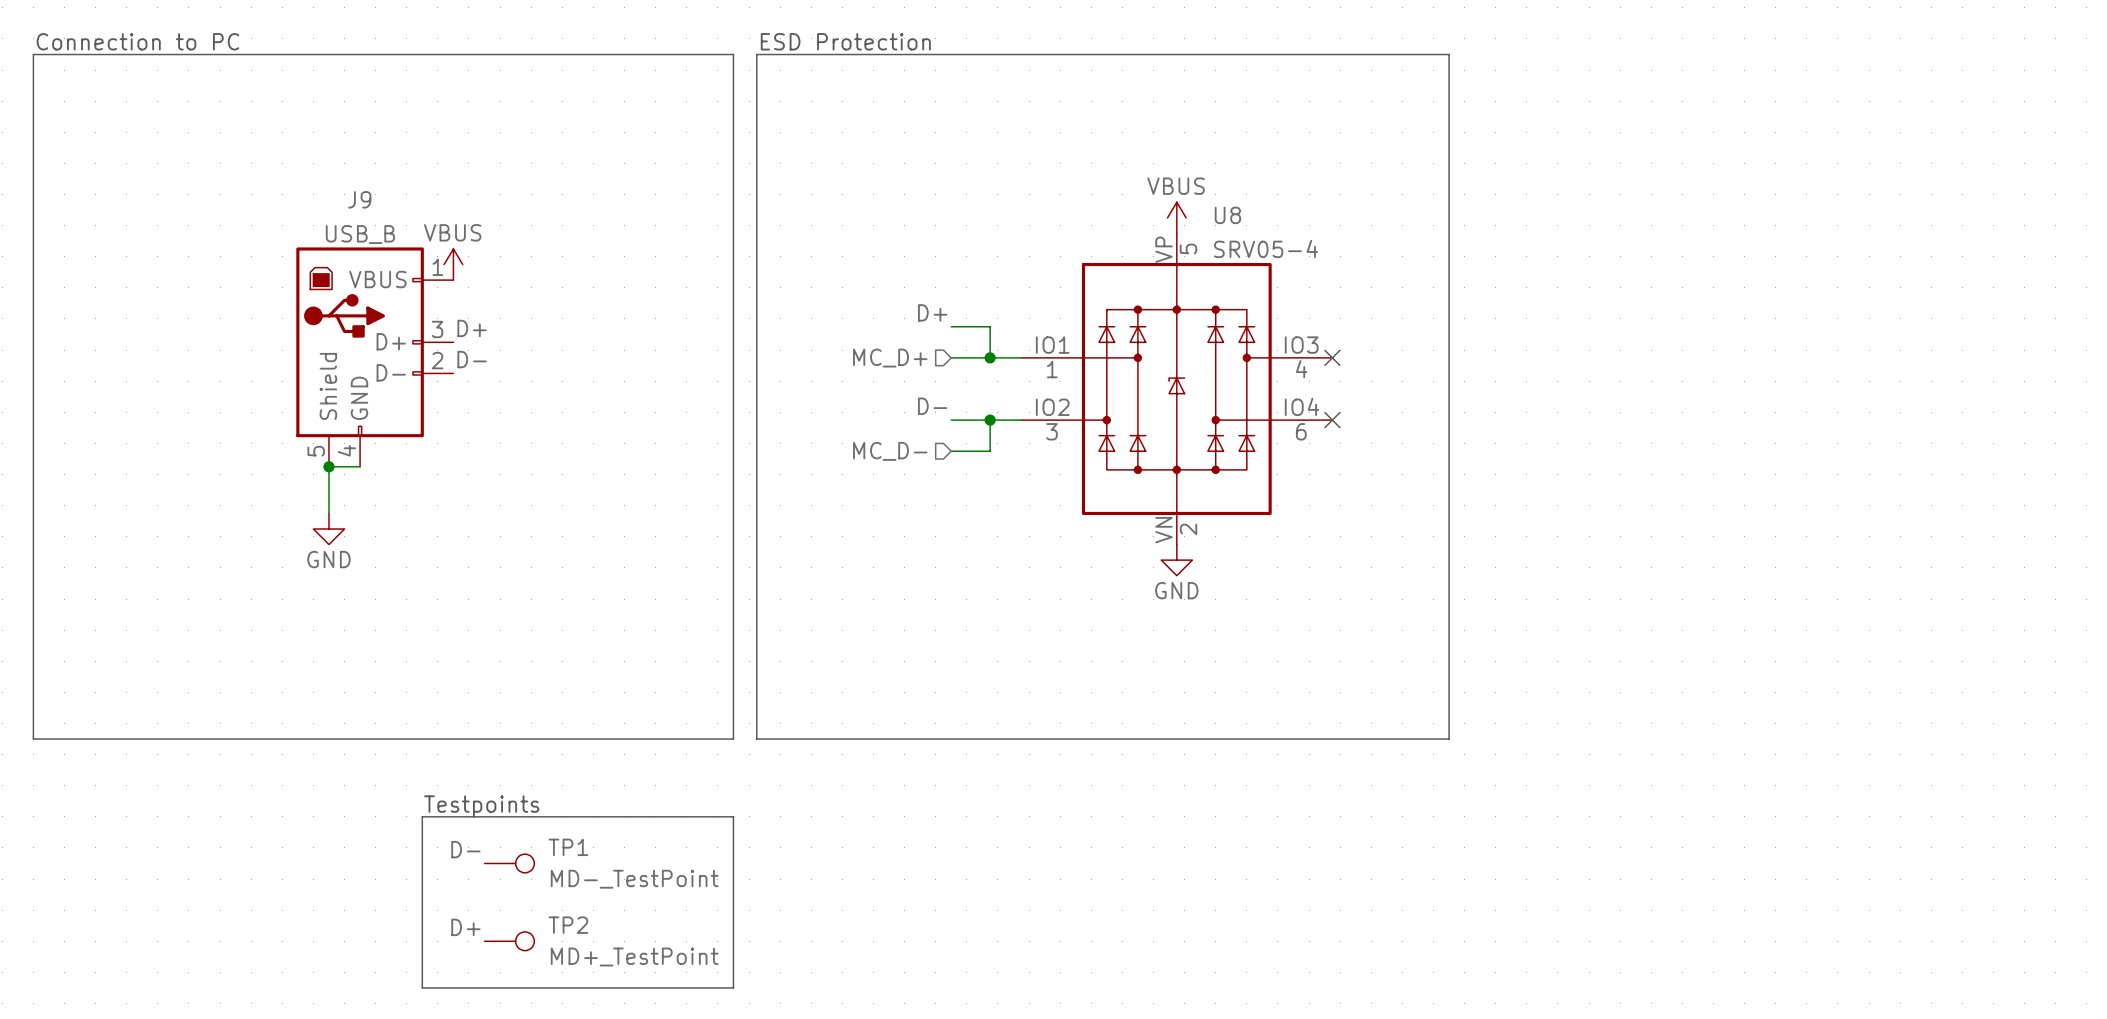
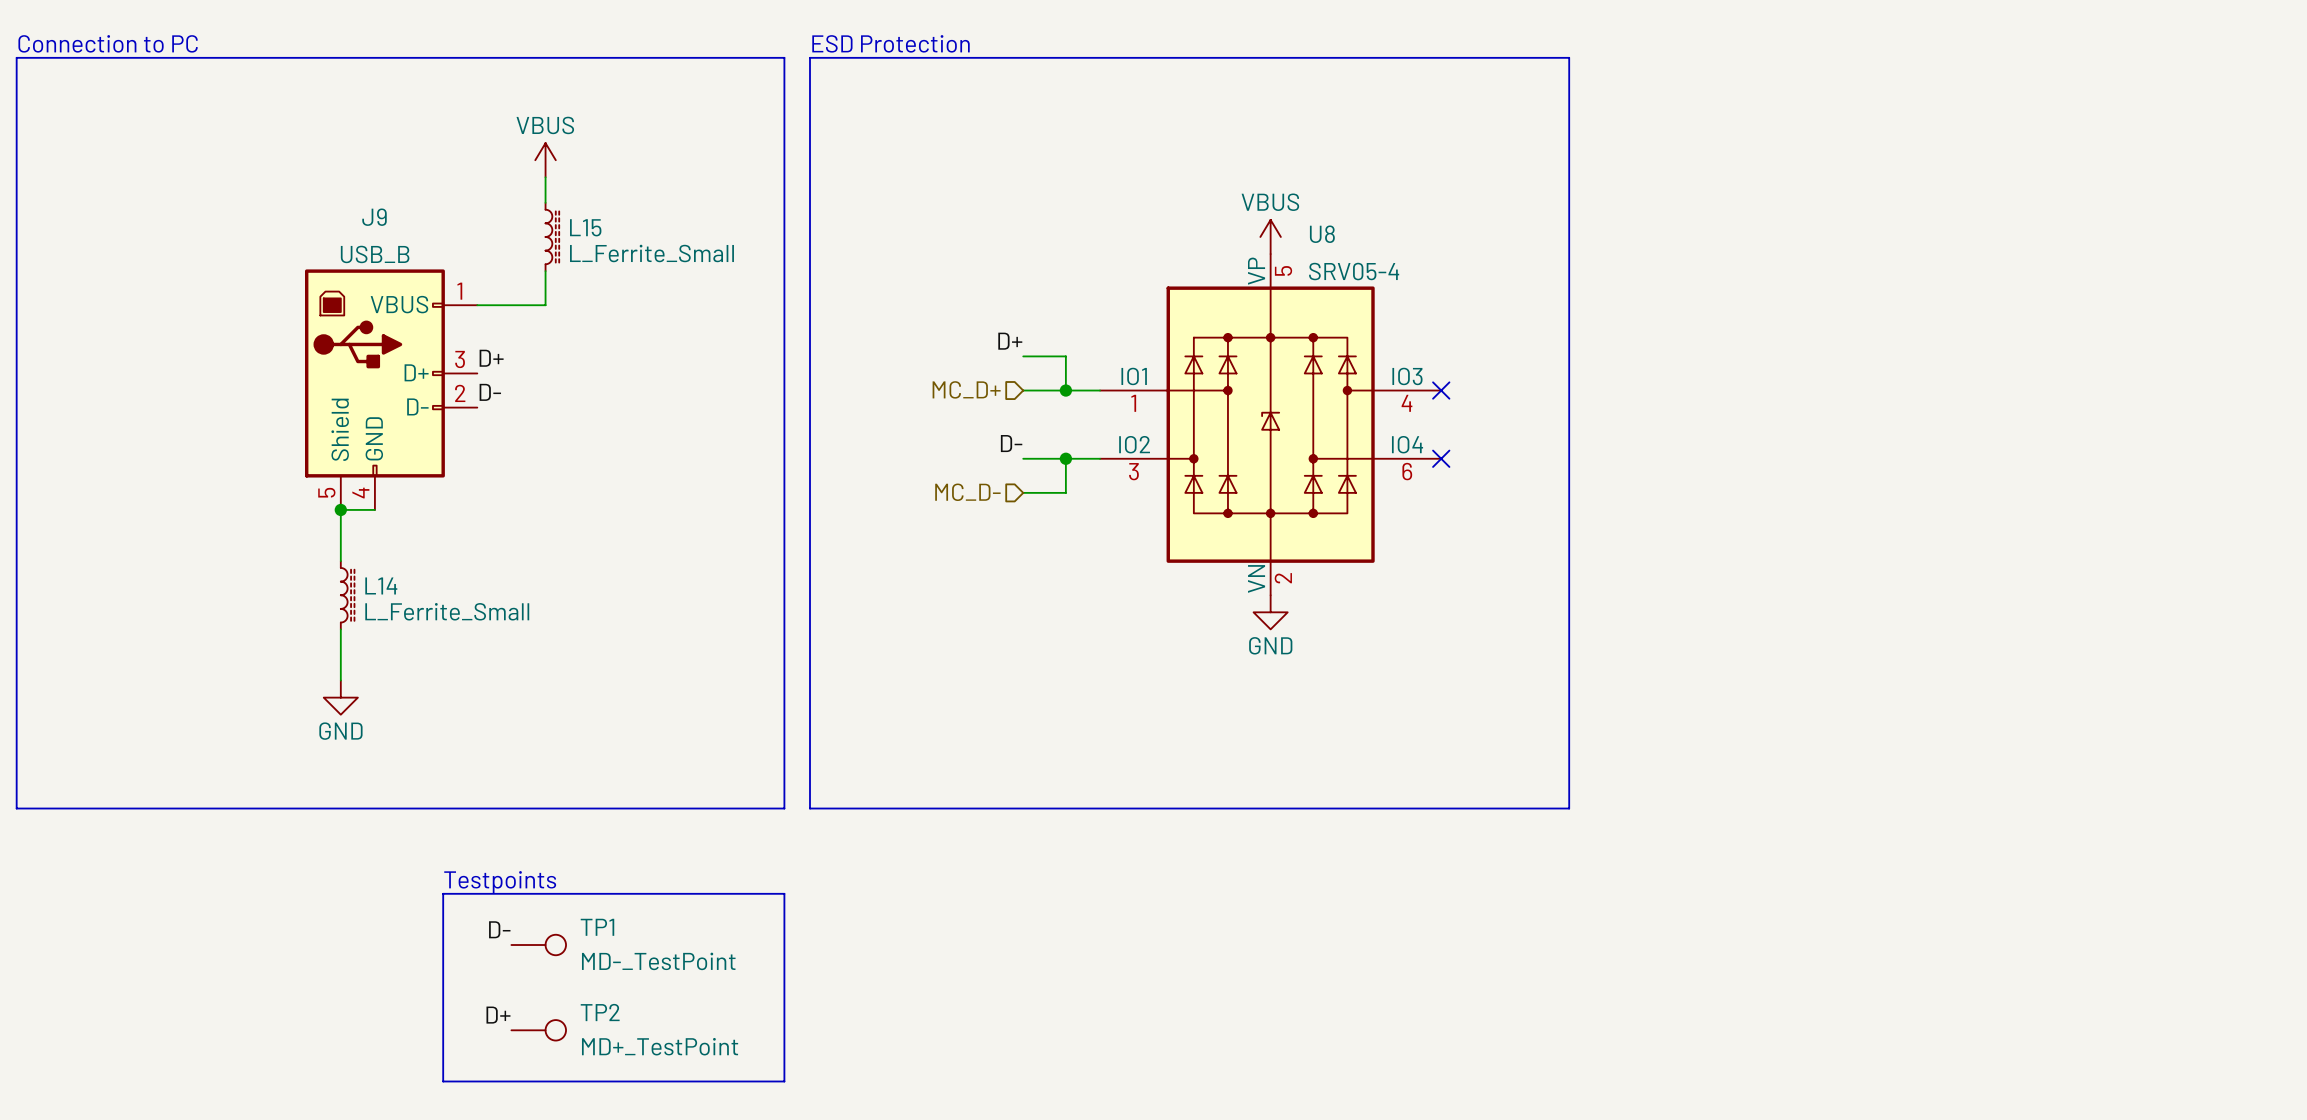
wire: none -> (545, 177) (545, 202)
L15: none -> L_Ferrite_Small (552, 236)
wire: none -> (545, 271) (545, 305) (477, 305)
power symbol position: VBUS (453, 264) -> VBUS (545, 160)
power symbol position: GND (328, 529) -> GND (340, 697)
L14: none -> L_Ferrite_Small (347, 595)
wire: none -> (340, 629) (340, 680)

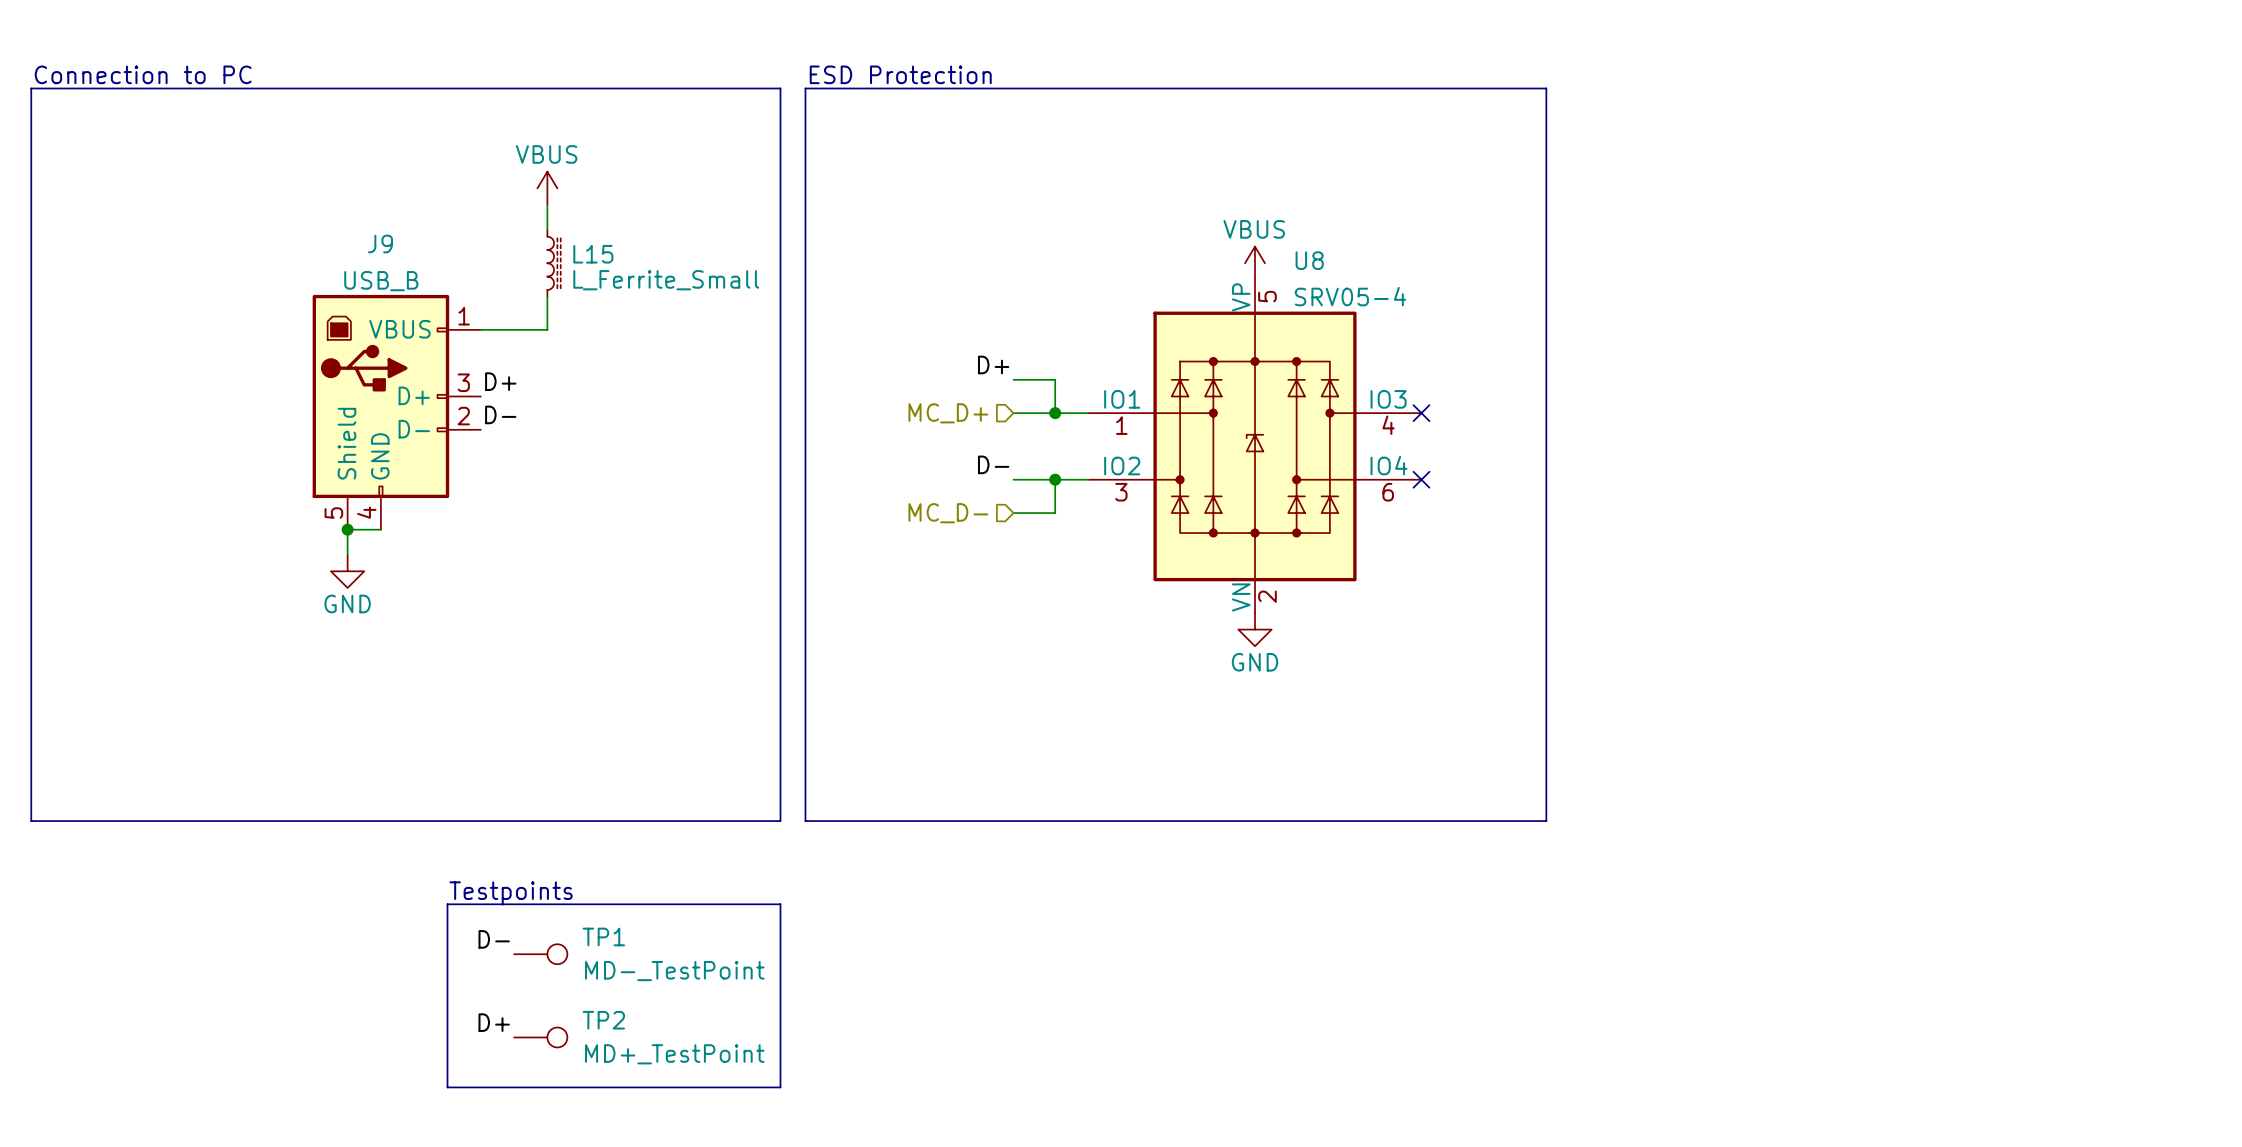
L14: L_Ferrite_Small (347, 595) -> none
wire: (340, 629) (340, 680) -> none
power symbol position: GND (340, 697) -> GND (347, 571)

